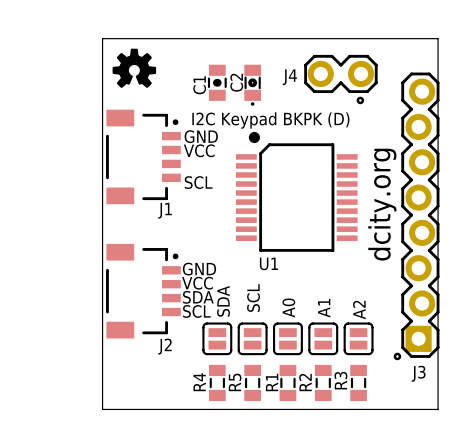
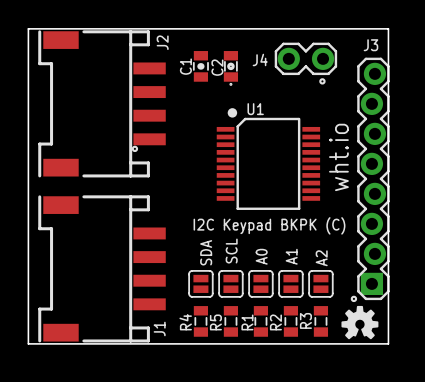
board edge: (102, 38) (102, 409) -> (103, 28) (28, 28) (28, 343) (103, 343)
drawing: [112, 48, 157, 88] -> none
J1 footprint: [106, 109, 181, 205] -> [38, 195, 166, 343]
text: I2C Keypad BKPK (D) (270, 120) -> none
text: GND (201, 136) -> none
text: VCC (199, 150) -> none
drawing: none -> [131, 145, 139, 153]
text: SCL (198, 182) -> none
text: dcity.org (382, 204) -> wht.io (338, 157)
J1 name position: J1 (165, 210) -> J1 (159, 328)
J2 footprint: [106, 243, 181, 339] -> [38, 30, 166, 178]
U1 name position: U1 (268, 263) -> U1 (255, 109)
text: GND (199, 269) -> none
text: none -> I2C Keypad BKPK (C) (269, 225)
text: VCC (197, 283) -> none
text: SDA (198, 297) -> none
text: SCL (196, 311) -> none
J2 name position: J2 (165, 346) -> J2 (162, 42)
drawing: none -> [341, 305, 379, 340]
J3 name position: J3 (418, 373) -> J3 (370, 45)

